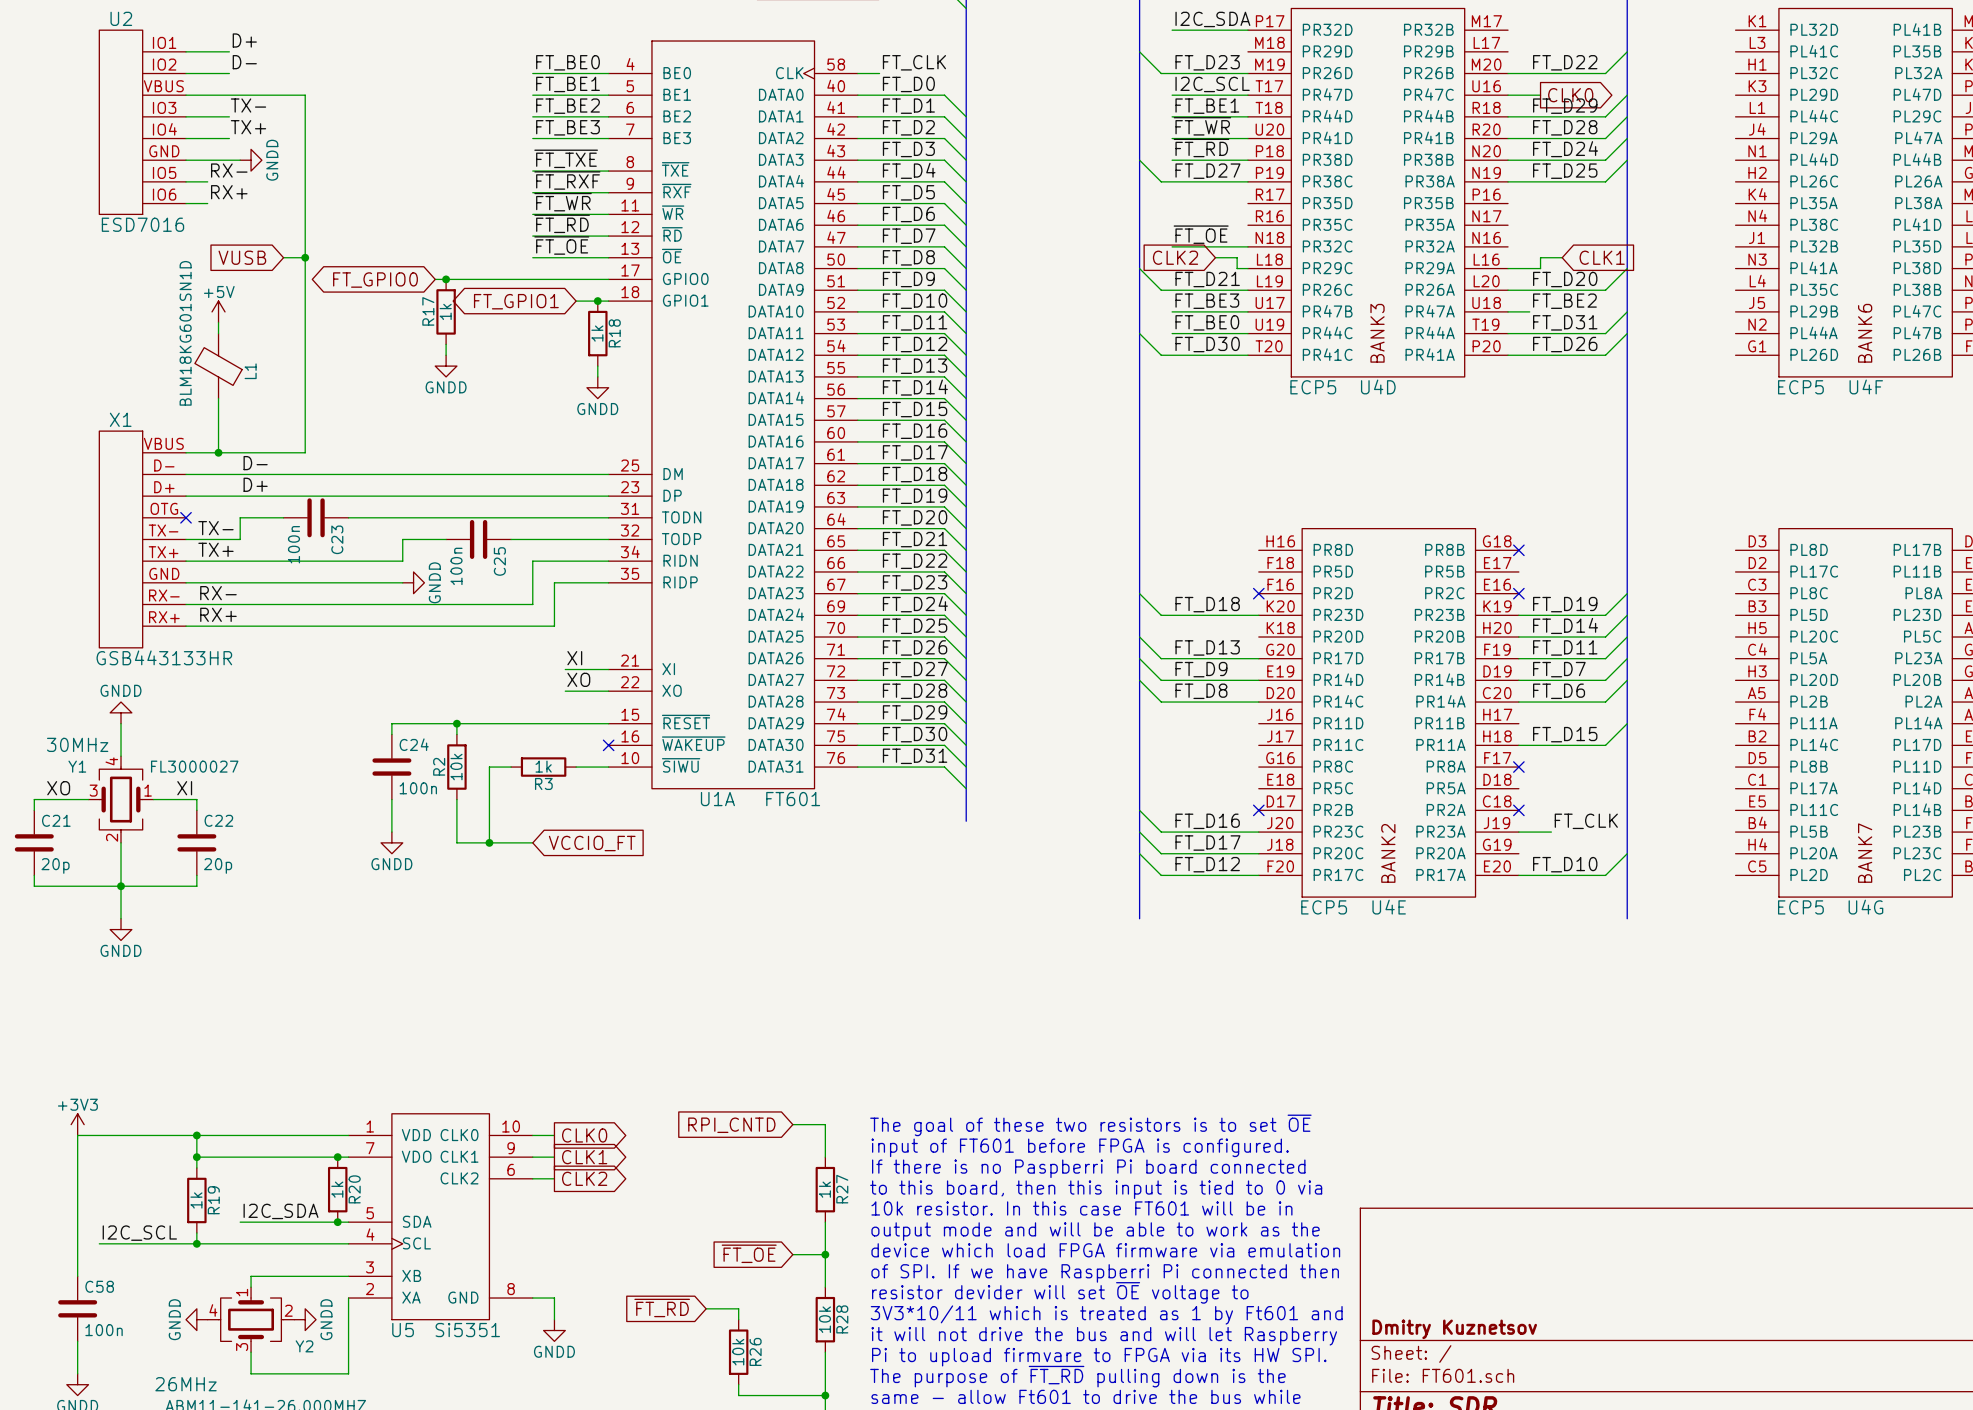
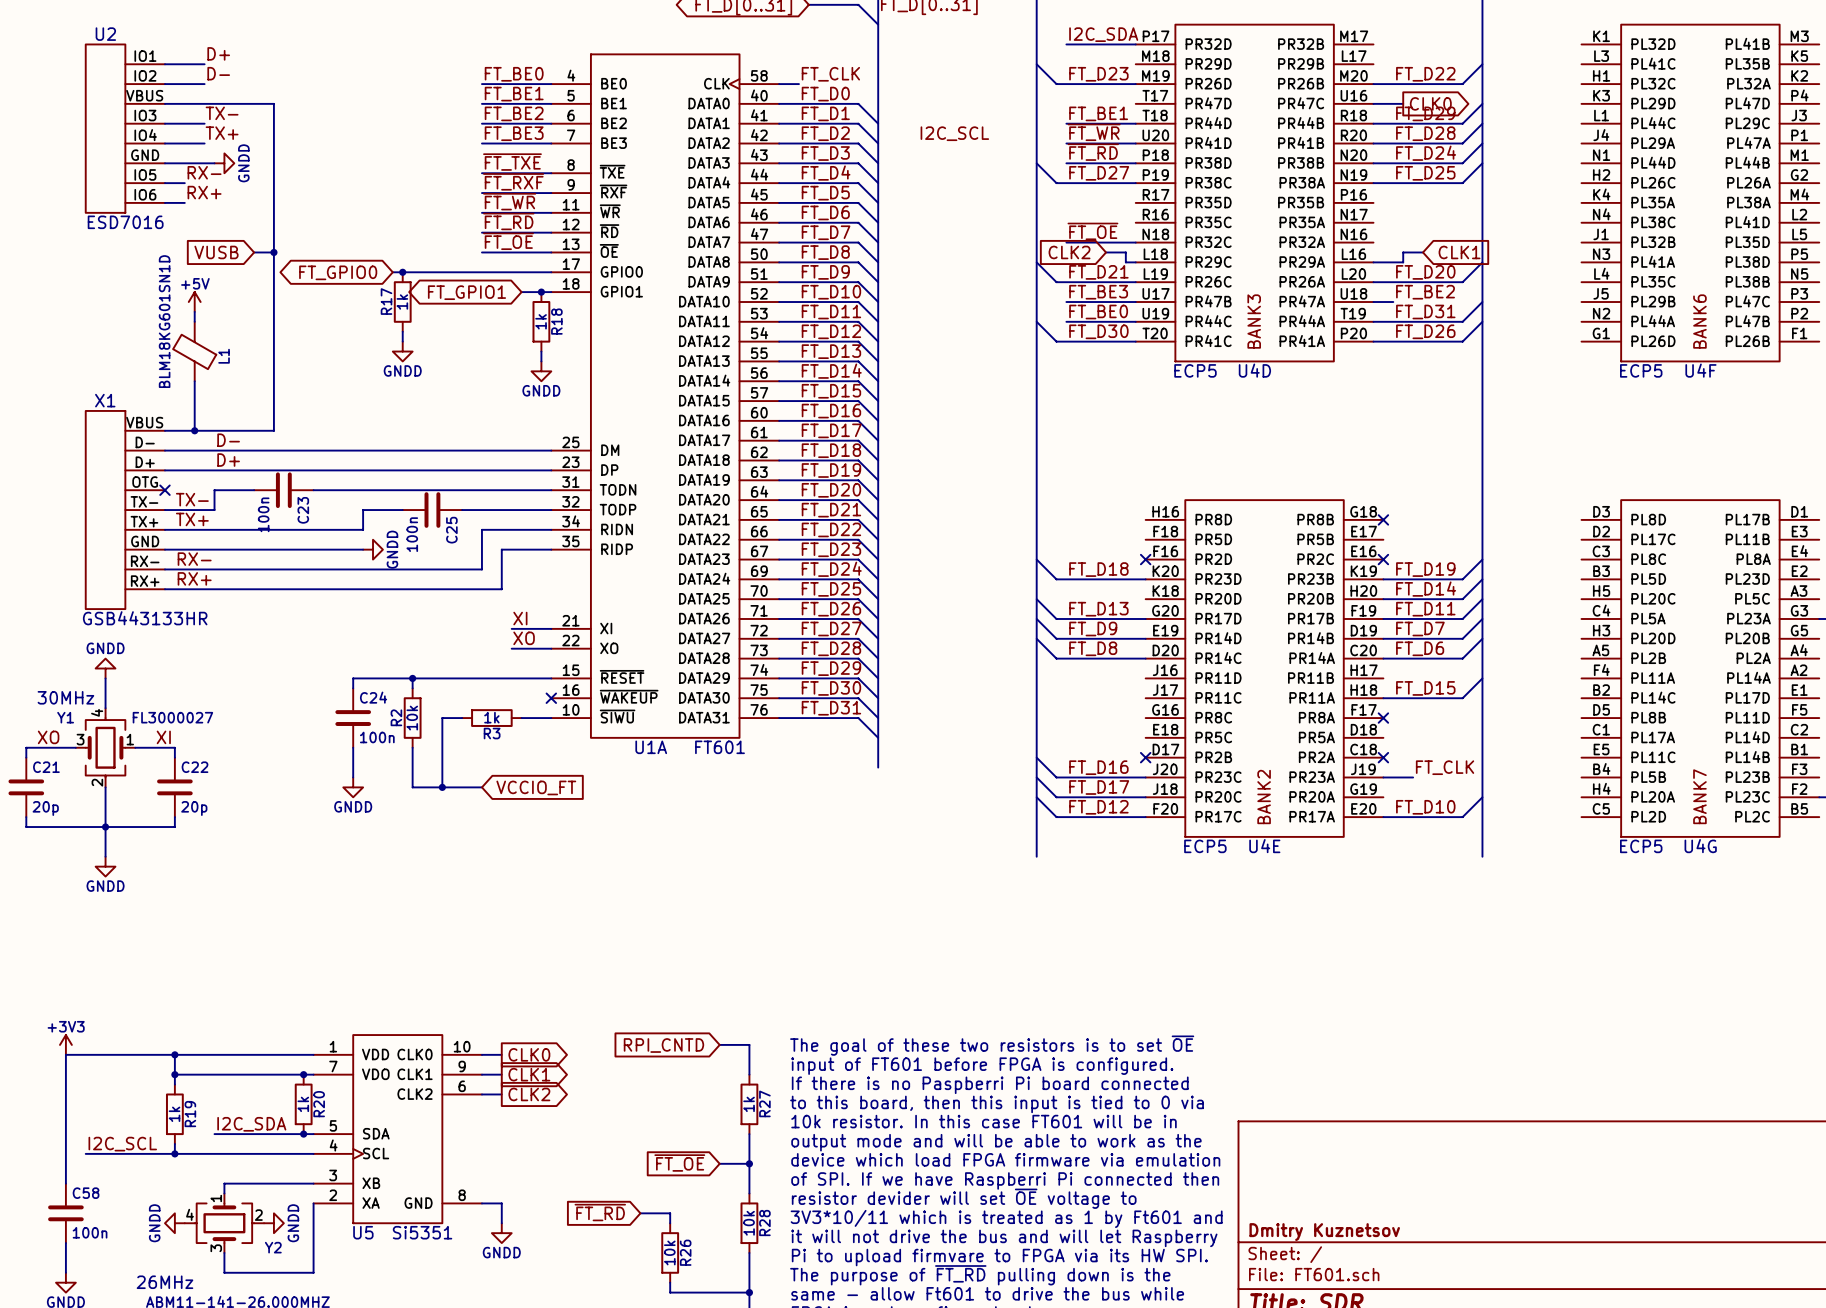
label position: I2C_SCL (1212, 84) -> I2C_SCL (954, 133)
wire: (1172, 95) (1247, 95) -> none

